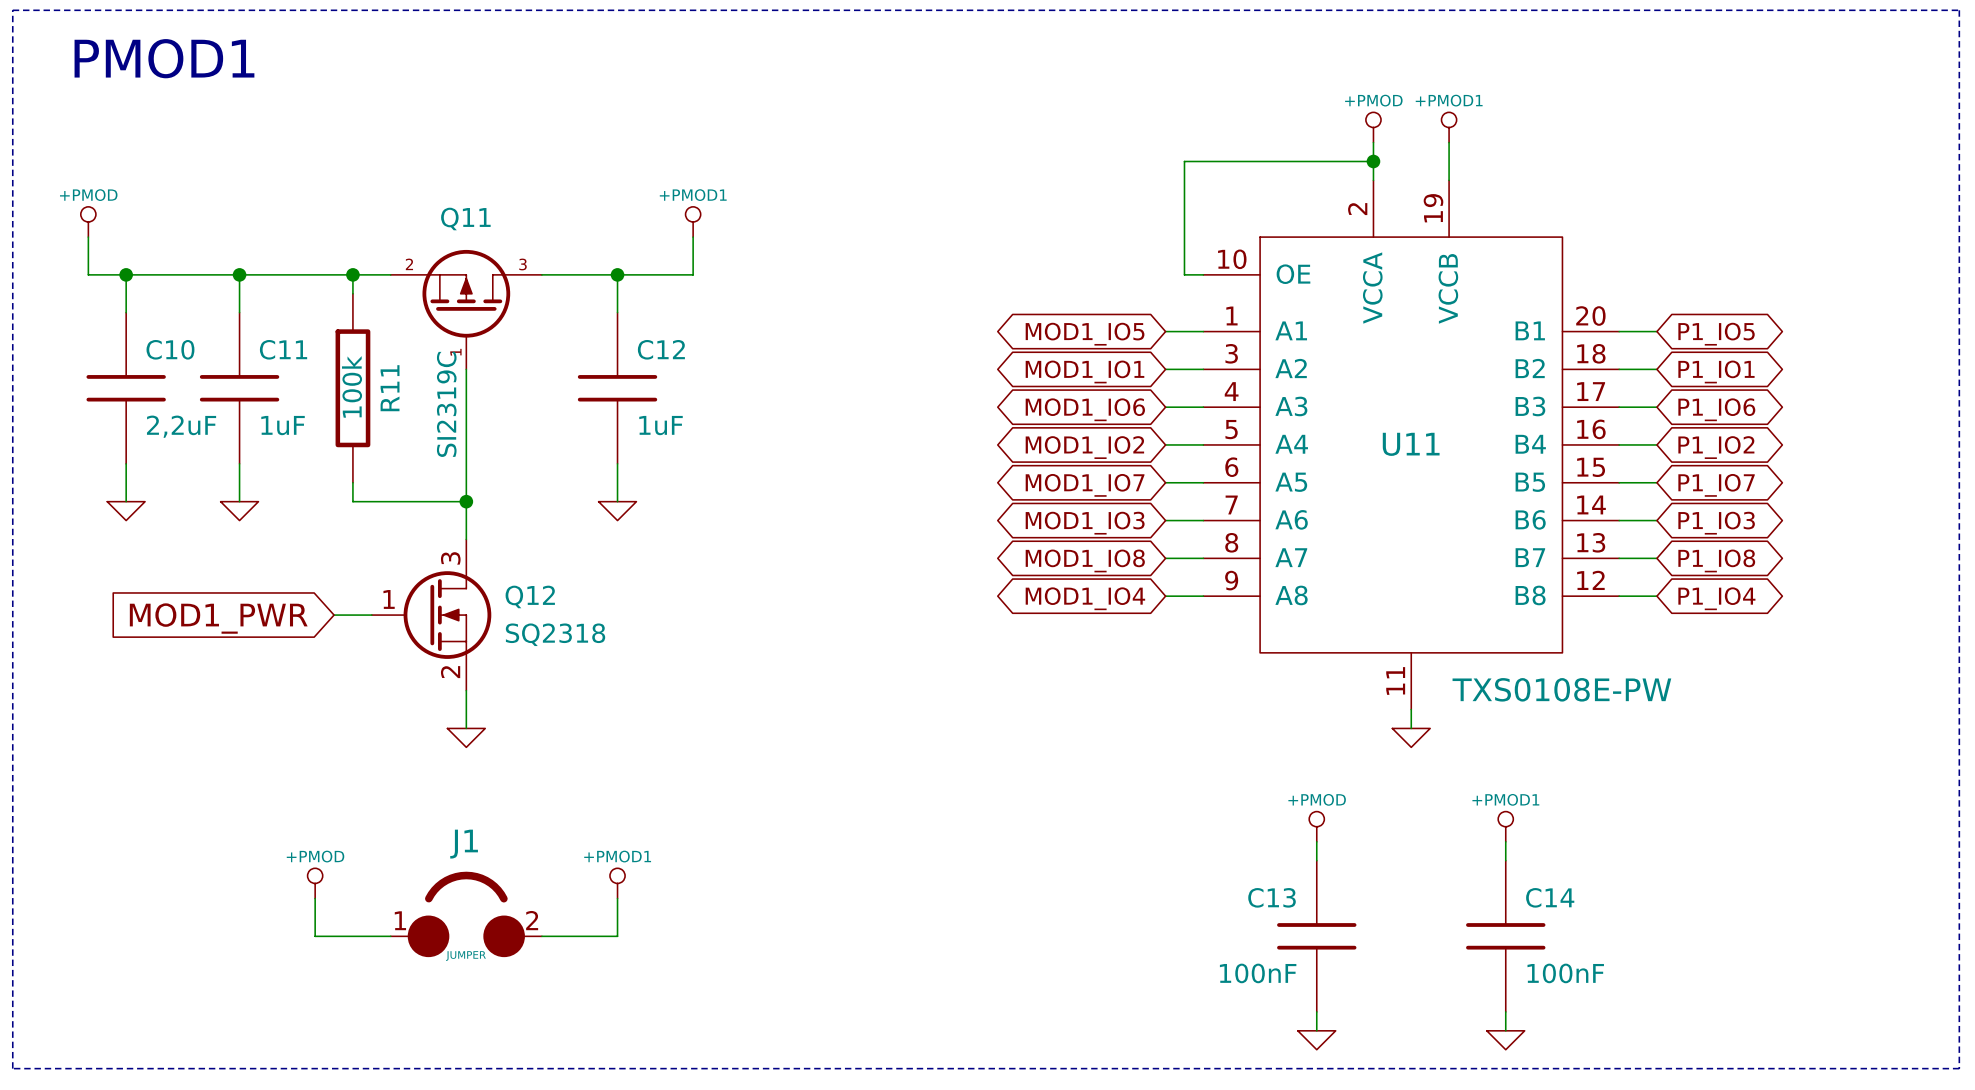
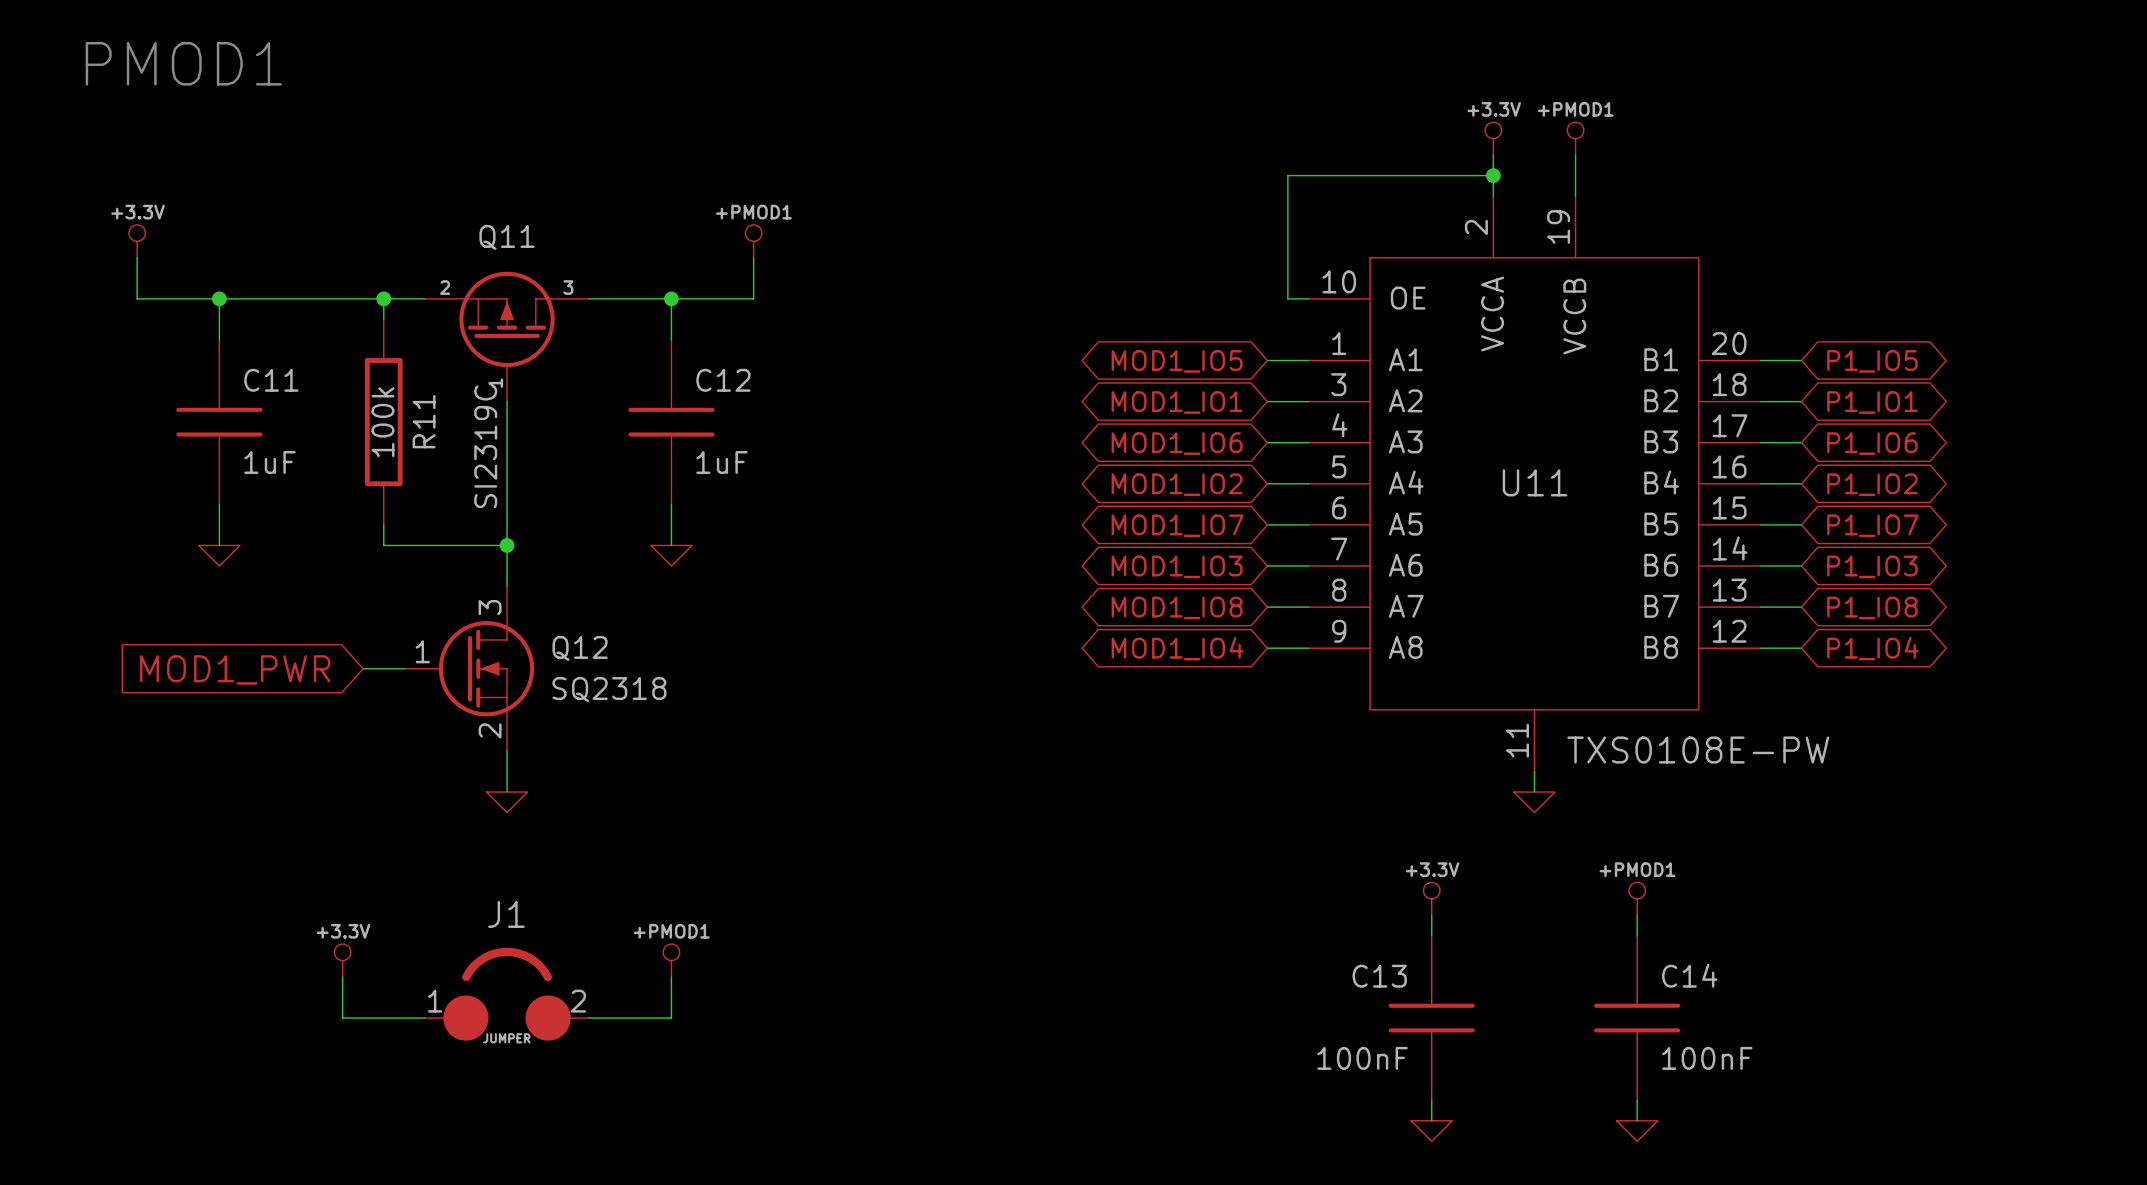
line: (12, 10) (12, 1068) (1959, 1068) (1959, 10) (12, 10) -> none
power symbol: +PMOD (1373, 127) -> +3.3V (1493, 138)
power symbol: +PMOD (88, 221) -> none
power symbol: none -> +3.3V (137, 241)
wire: (88, 237) (88, 274) (126, 274) (126, 312) -> none
junction: (126, 274) -> none
junction: none -> (219, 298)
wire: (239, 274) (239, 312) -> (219, 298) (219, 339)
junction: (239, 274) -> none
C10: 2,2uF (126, 388) -> none
C11 position: (239, 388) -> (219, 422)
wire: (126, 463) (126, 501) -> (137, 257) (137, 298)
wire: (239, 463) (239, 501) -> (219, 504) (219, 545)
power symbol: (126, 511) -> none
power symbol: none -> (219, 555)
power symbol: (239, 511) -> none
power symbol: +PMOD (1316, 826) -> +3.3V (1431, 898)
power symbol: +PMOD (315, 883) -> +3.3V (342, 960)

